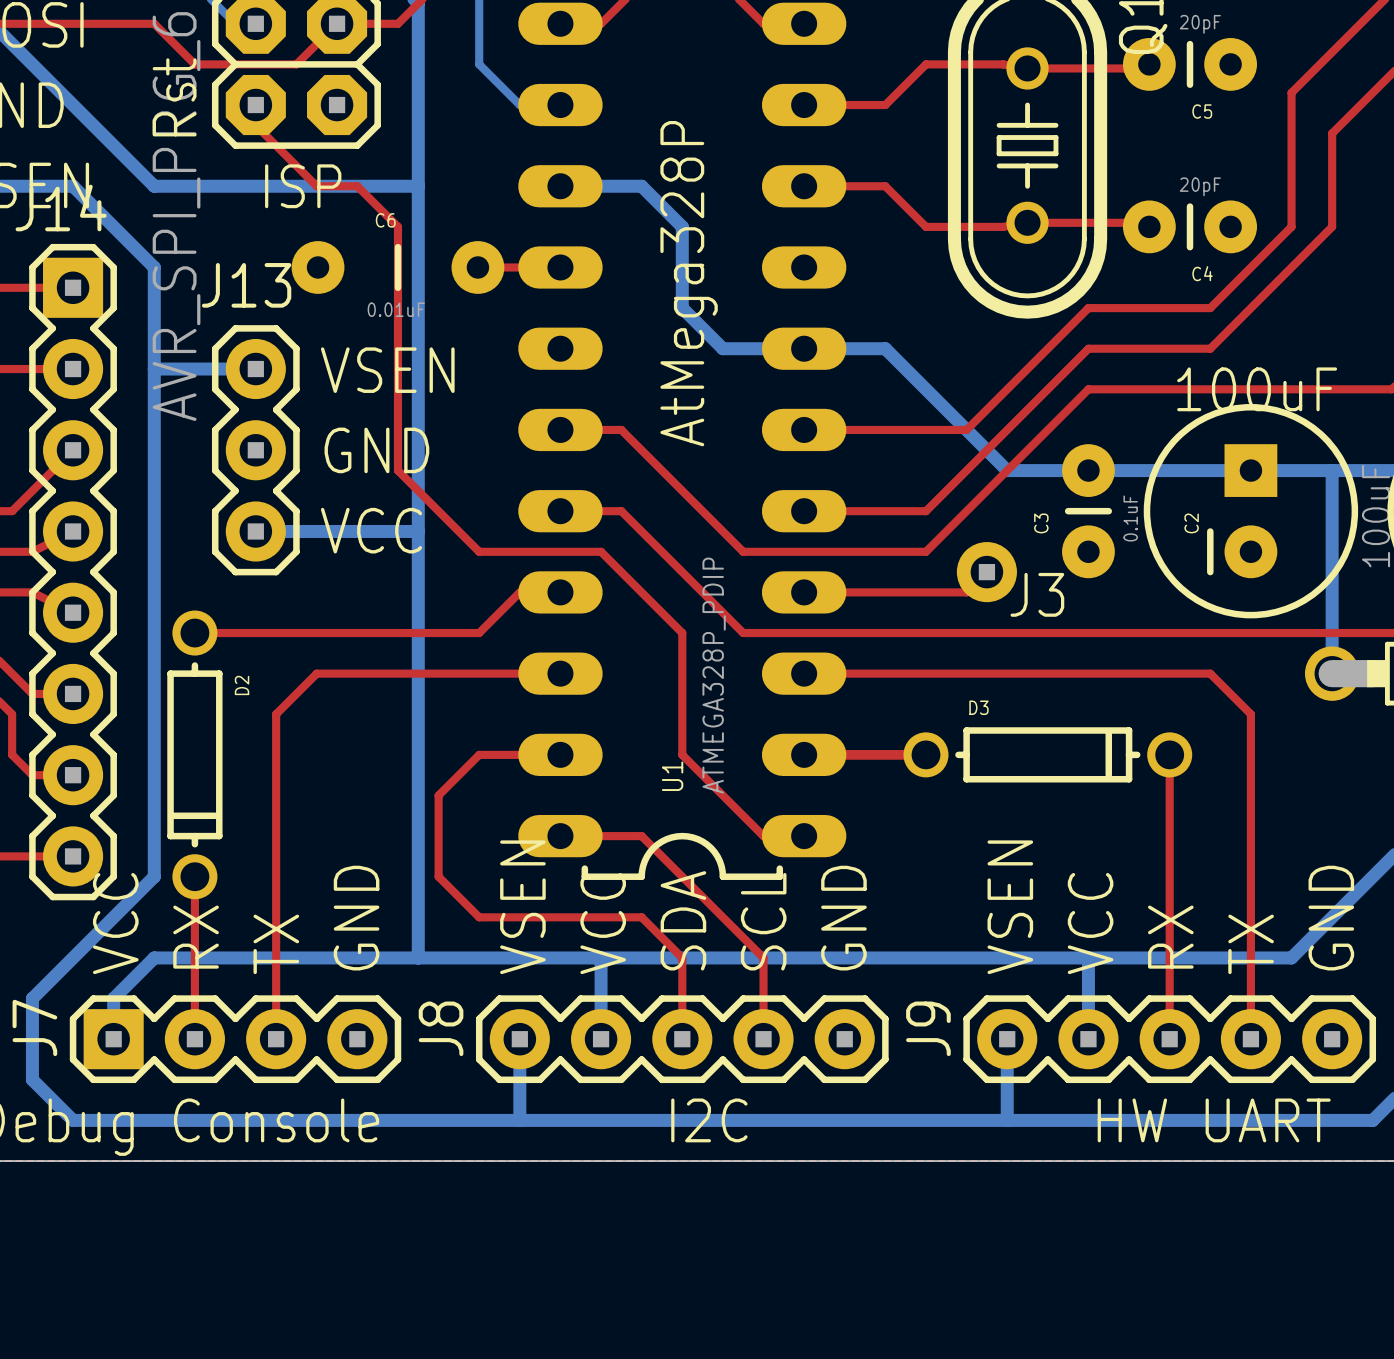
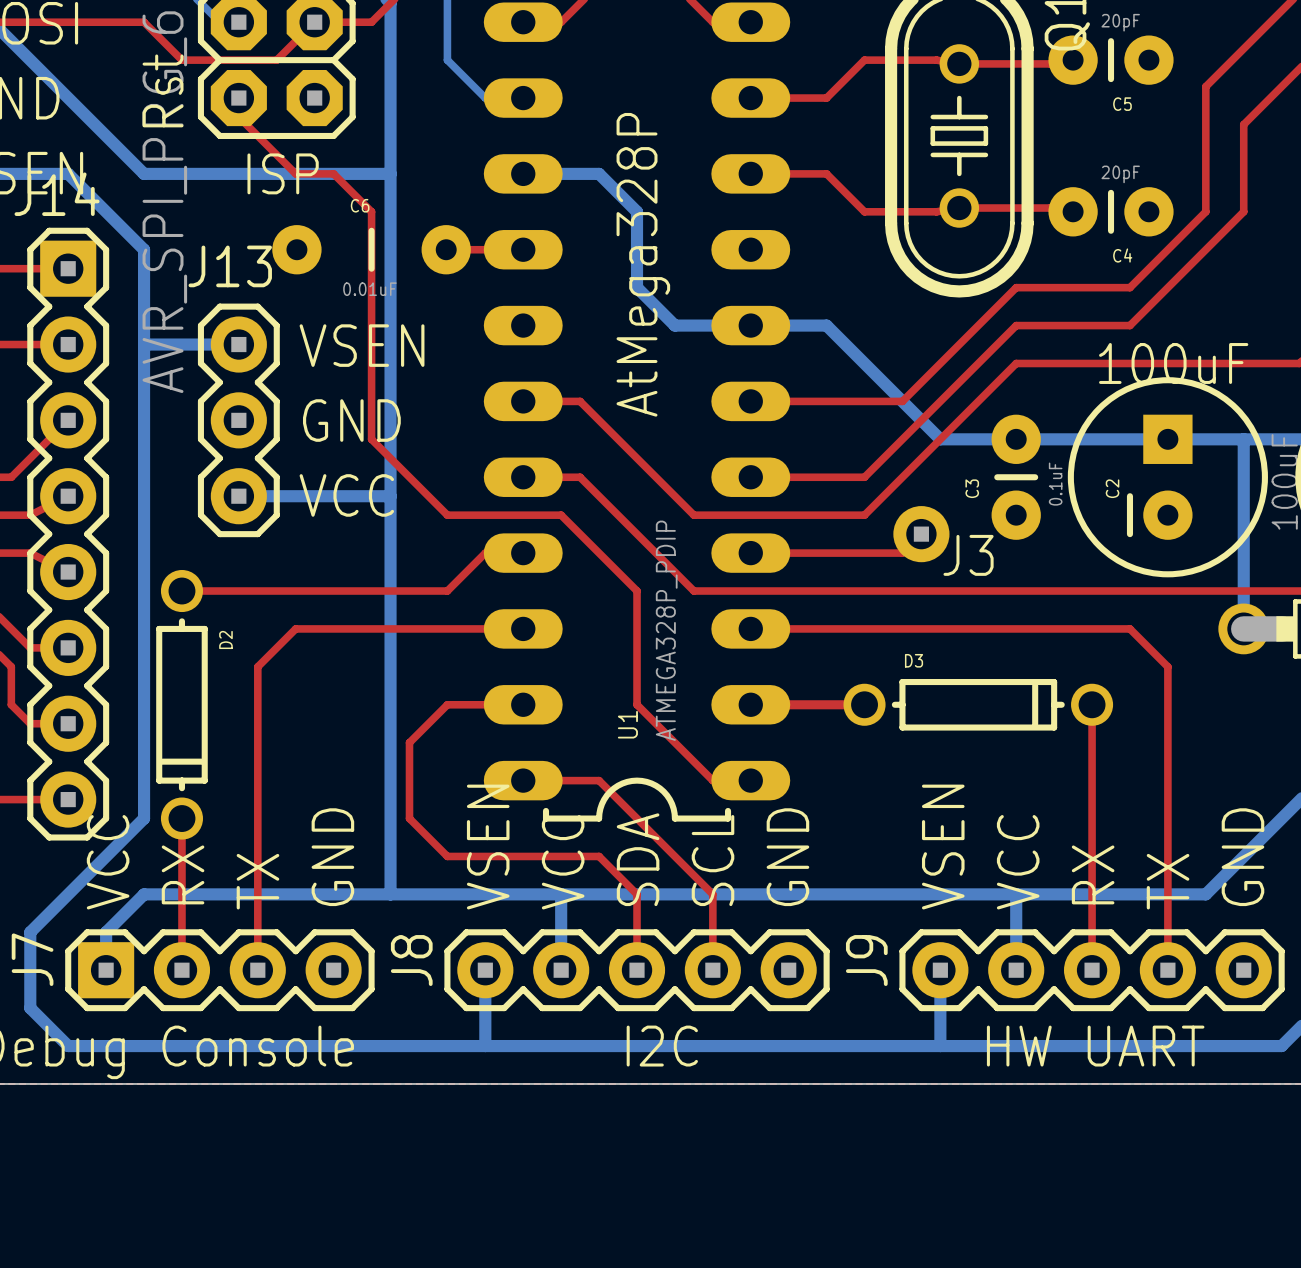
text position: HW UART (1214, 1120) -> HW UART (1095, 1046)

